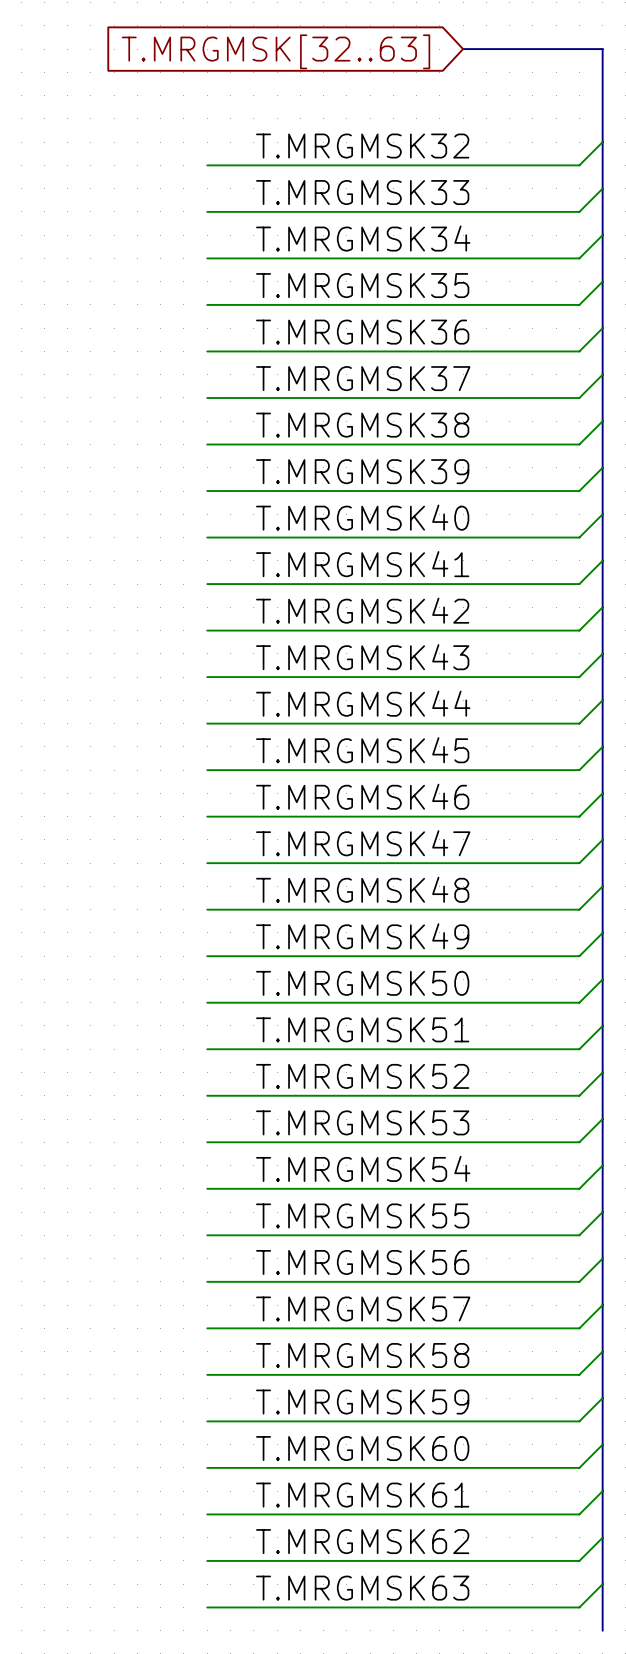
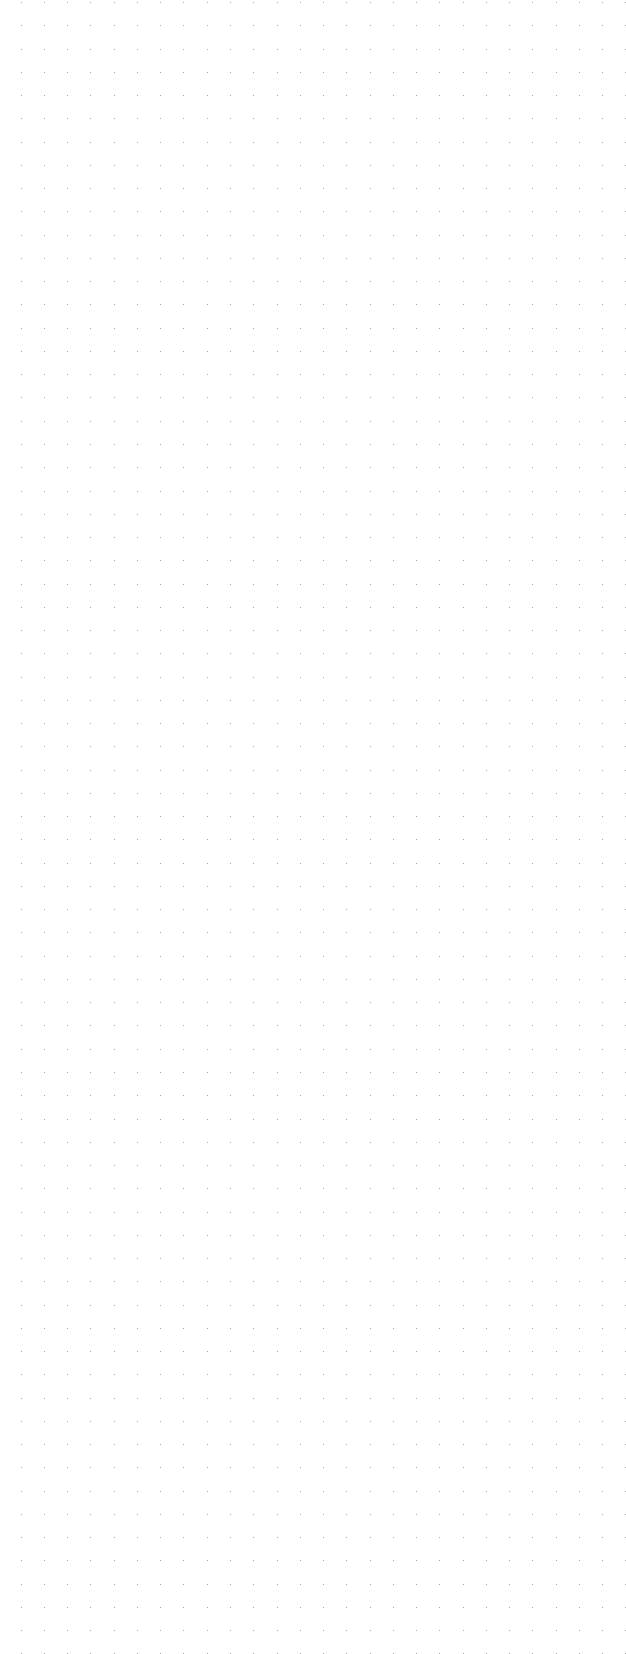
bus: (463, 49) (602, 49) (602, 1630) -> none
global label: T.MRGMSK[32..63] (275, 51) -> none
wire: (602, 142) (579, 165) (207, 165) -> none
label: T.MRGMSK32 (362, 146) -> none
wire: (602, 188) (579, 211) (207, 211) -> none
label: T.MRGMSK33 (362, 192) -> none
wire: (602, 235) (579, 258) (207, 258) -> none
label: T.MRGMSK34 (363, 238) -> none
wire: (602, 281) (579, 304) (207, 304) -> none
label: T.MRGMSK35 (362, 285) -> none
wire: (602, 328) (579, 351) (207, 351) -> none
label: T.MRGMSK36 (362, 332) -> none
wire: (602, 374) (579, 397) (207, 397) -> none
label: T.MRGMSK37 (363, 378) -> none
wire: (602, 421) (579, 444) (207, 444) -> none
label: T.MRGMSK38 (362, 425) -> none
wire: (602, 467) (579, 491) (207, 491) -> none
label: T.MRGMSK39 (362, 471) -> none
wire: (602, 514) (579, 537) (207, 537) -> none
label: T.MRGMSK40 (362, 517) -> none
wire: (602, 560) (579, 584) (207, 584) -> none
label: T.MRGMSK41 (362, 564) -> none
wire: (602, 607) (579, 630) (207, 630) -> none
label: T.MRGMSK42 (362, 610) -> none
wire: (602, 653) (579, 677) (207, 677) -> none
label: T.MRGMSK43 (362, 657) -> none
wire: (602, 700) (579, 723) (207, 723) -> none
label: T.MRGMSK44 (363, 703) -> none
wire: (602, 746) (579, 770) (207, 770) -> none
label: T.MRGMSK45 (362, 750) -> none
wire: (602, 793) (579, 816) (207, 816) -> none
label: T.MRGMSK46 (362, 796) -> none
wire: (602, 839) (579, 863) (207, 863) -> none
label: T.MRGMSK47 (363, 843) -> none
wire: (602, 886) (579, 909) (207, 909) -> none
label: T.MRGMSK48 (362, 889) -> none
wire: (602, 932) (579, 956) (207, 956) -> none
label: T.MRGMSK49 (362, 936) -> none
wire: (602, 979) (579, 1002) (207, 1002) -> none
label: T.MRGMSK50 (362, 983) -> none
wire: (602, 1025) (579, 1049) (207, 1049) -> none
label: T.MRGMSK51 (362, 1029) -> none
wire: (602, 1072) (579, 1095) (207, 1095) -> none
label: T.MRGMSK52 (362, 1076) -> none
wire: (602, 1119) (579, 1142) (207, 1142) -> none
label: T.MRGMSK53 (362, 1122) -> none
wire: (602, 1165) (579, 1188) (207, 1188) -> none
label: T.MRGMSK54 (363, 1168) -> none
wire: (602, 1212) (579, 1235) (207, 1235) -> none
label: T.MRGMSK55 (362, 1215) -> none
wire: (602, 1258) (579, 1281) (207, 1281) -> none
label: T.MRGMSK56 (362, 1262) -> none
wire: (602, 1305) (579, 1328) (207, 1328) -> none
label: T.MRGMSK57 (363, 1308) -> none
wire: (602, 1351) (579, 1374) (207, 1374) -> none
label: T.MRGMSK58 (362, 1355) -> none
wire: (602, 1398) (579, 1421) (207, 1421) -> none
label: T.MRGMSK59 (362, 1402) -> none
wire: (602, 1444) (579, 1467) (207, 1467) -> none
label: T.MRGMSK60 (362, 1448) -> none
wire: (602, 1491) (579, 1514) (207, 1514) -> none
label: T.MRGMSK61 (362, 1495) -> none
wire: (602, 1537) (579, 1560) (207, 1560) -> none
label: T.MRGMSK62 (362, 1541) -> none
wire: (602, 1584) (579, 1607) (207, 1607) -> none
label: T.MRGMSK63 (362, 1588) -> none

